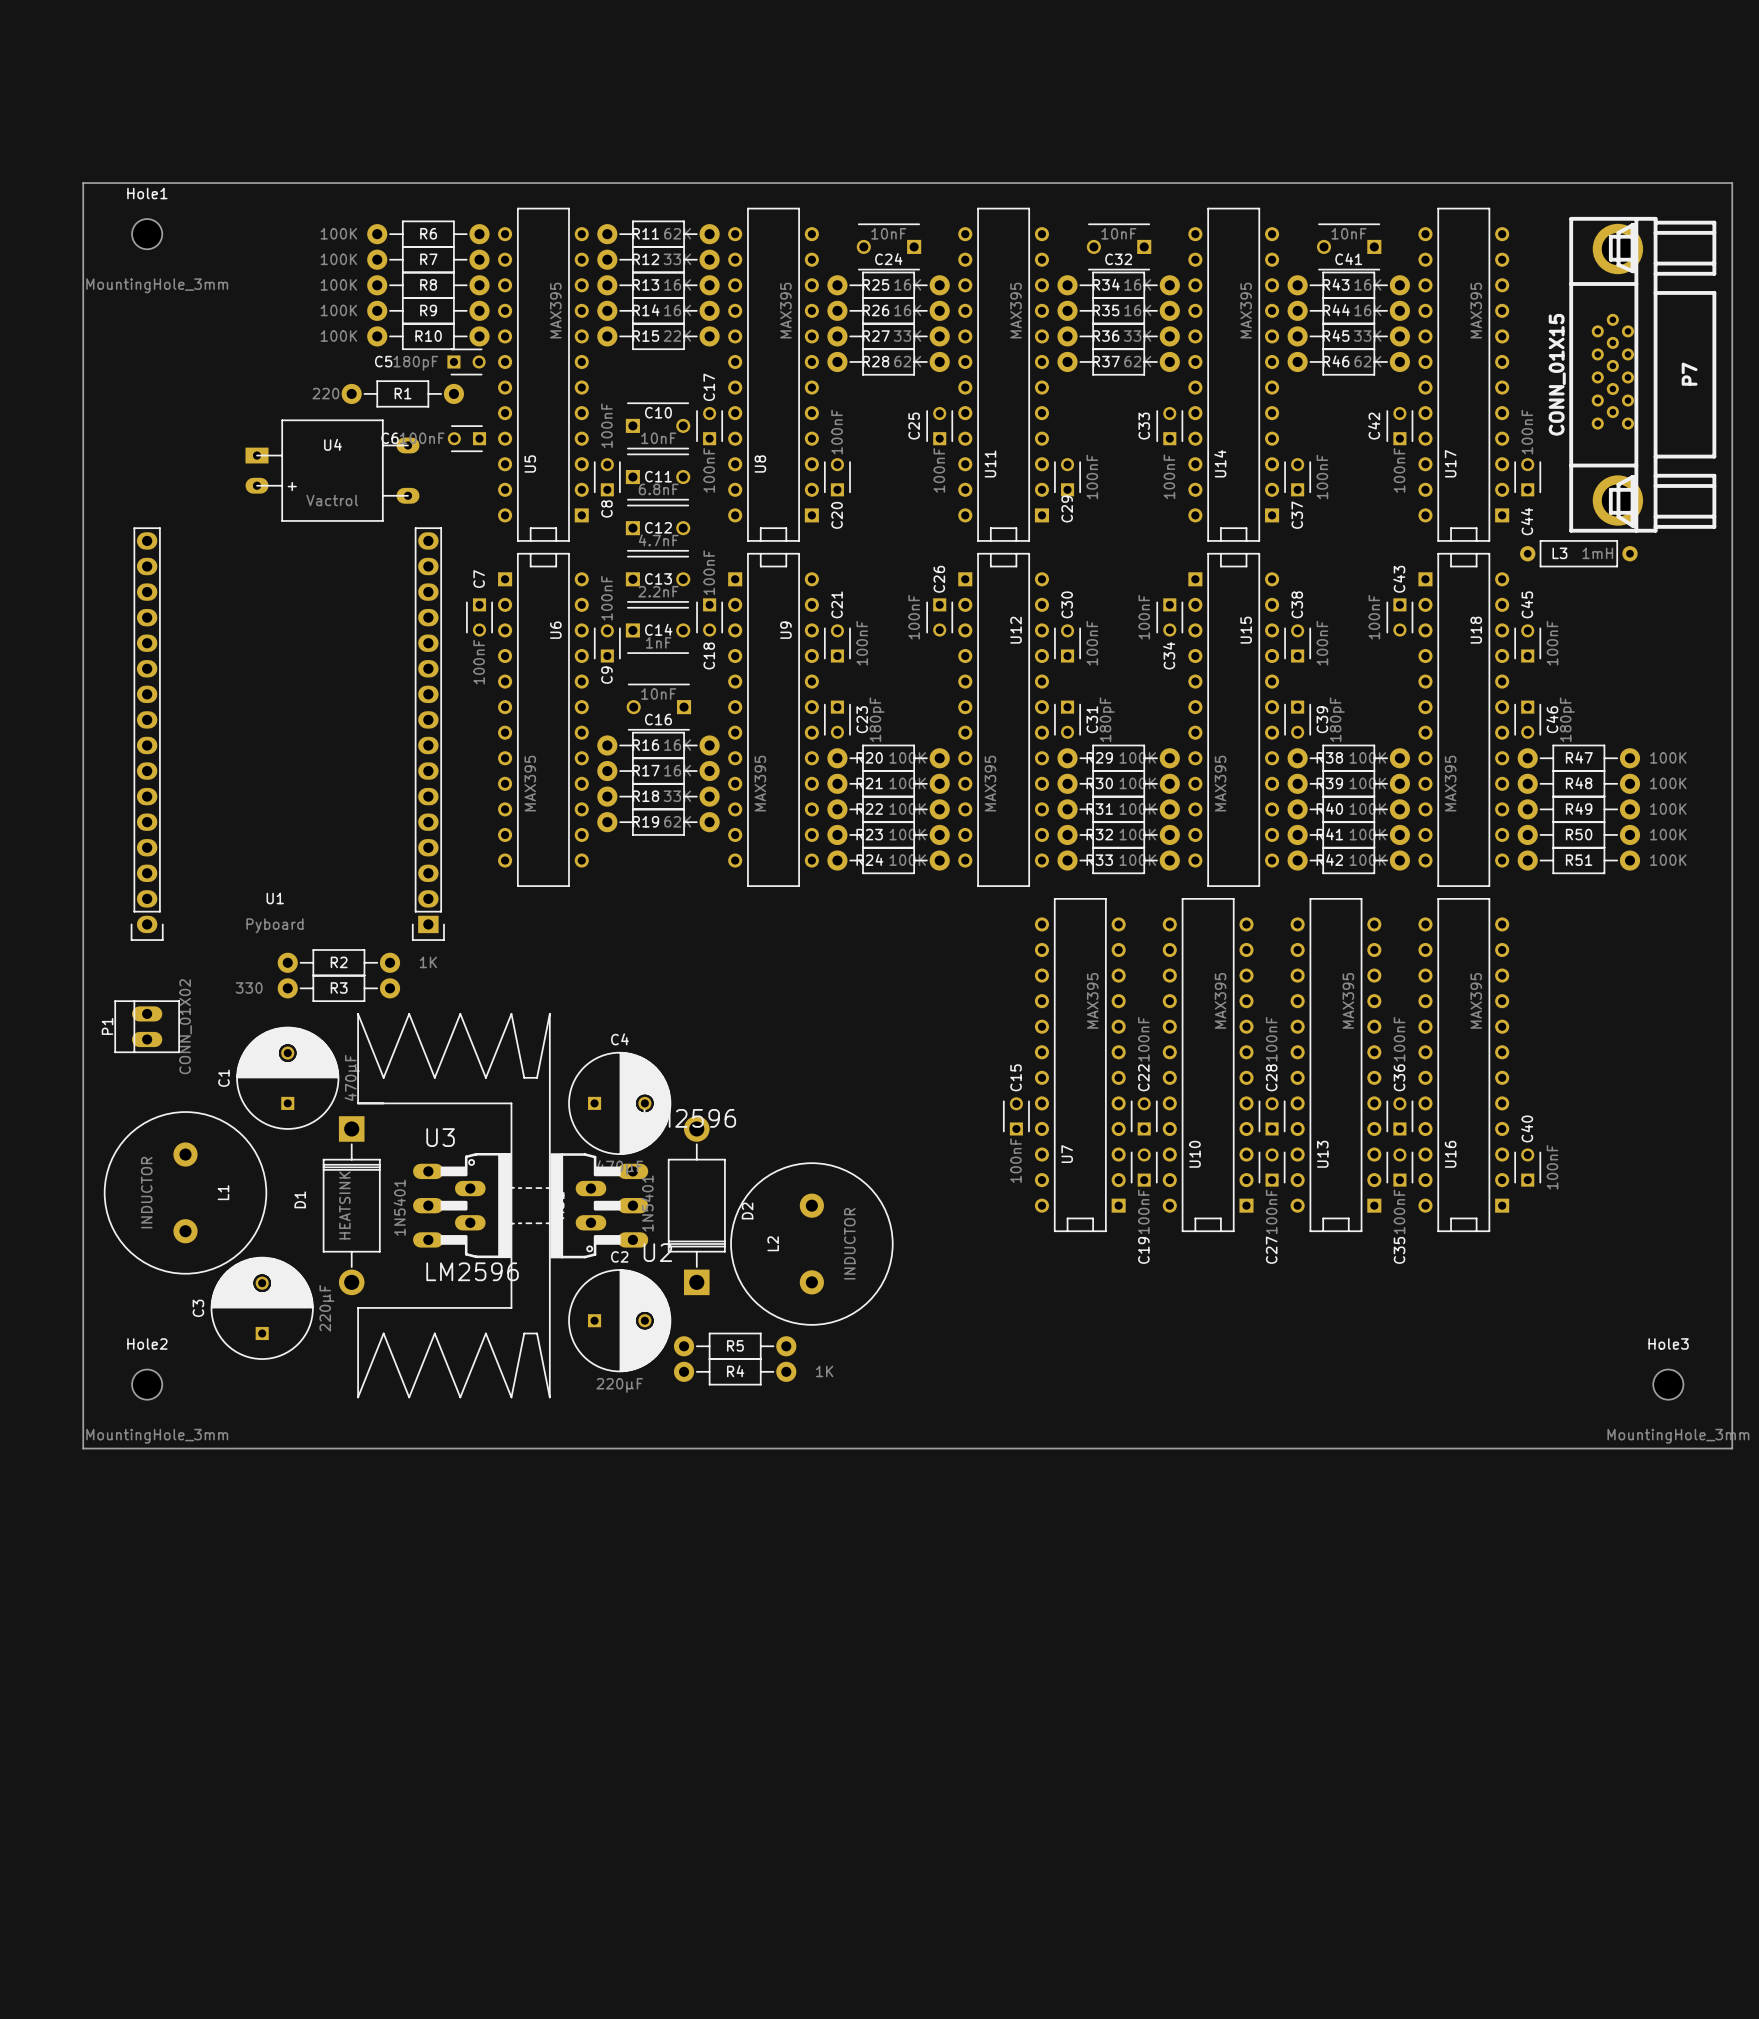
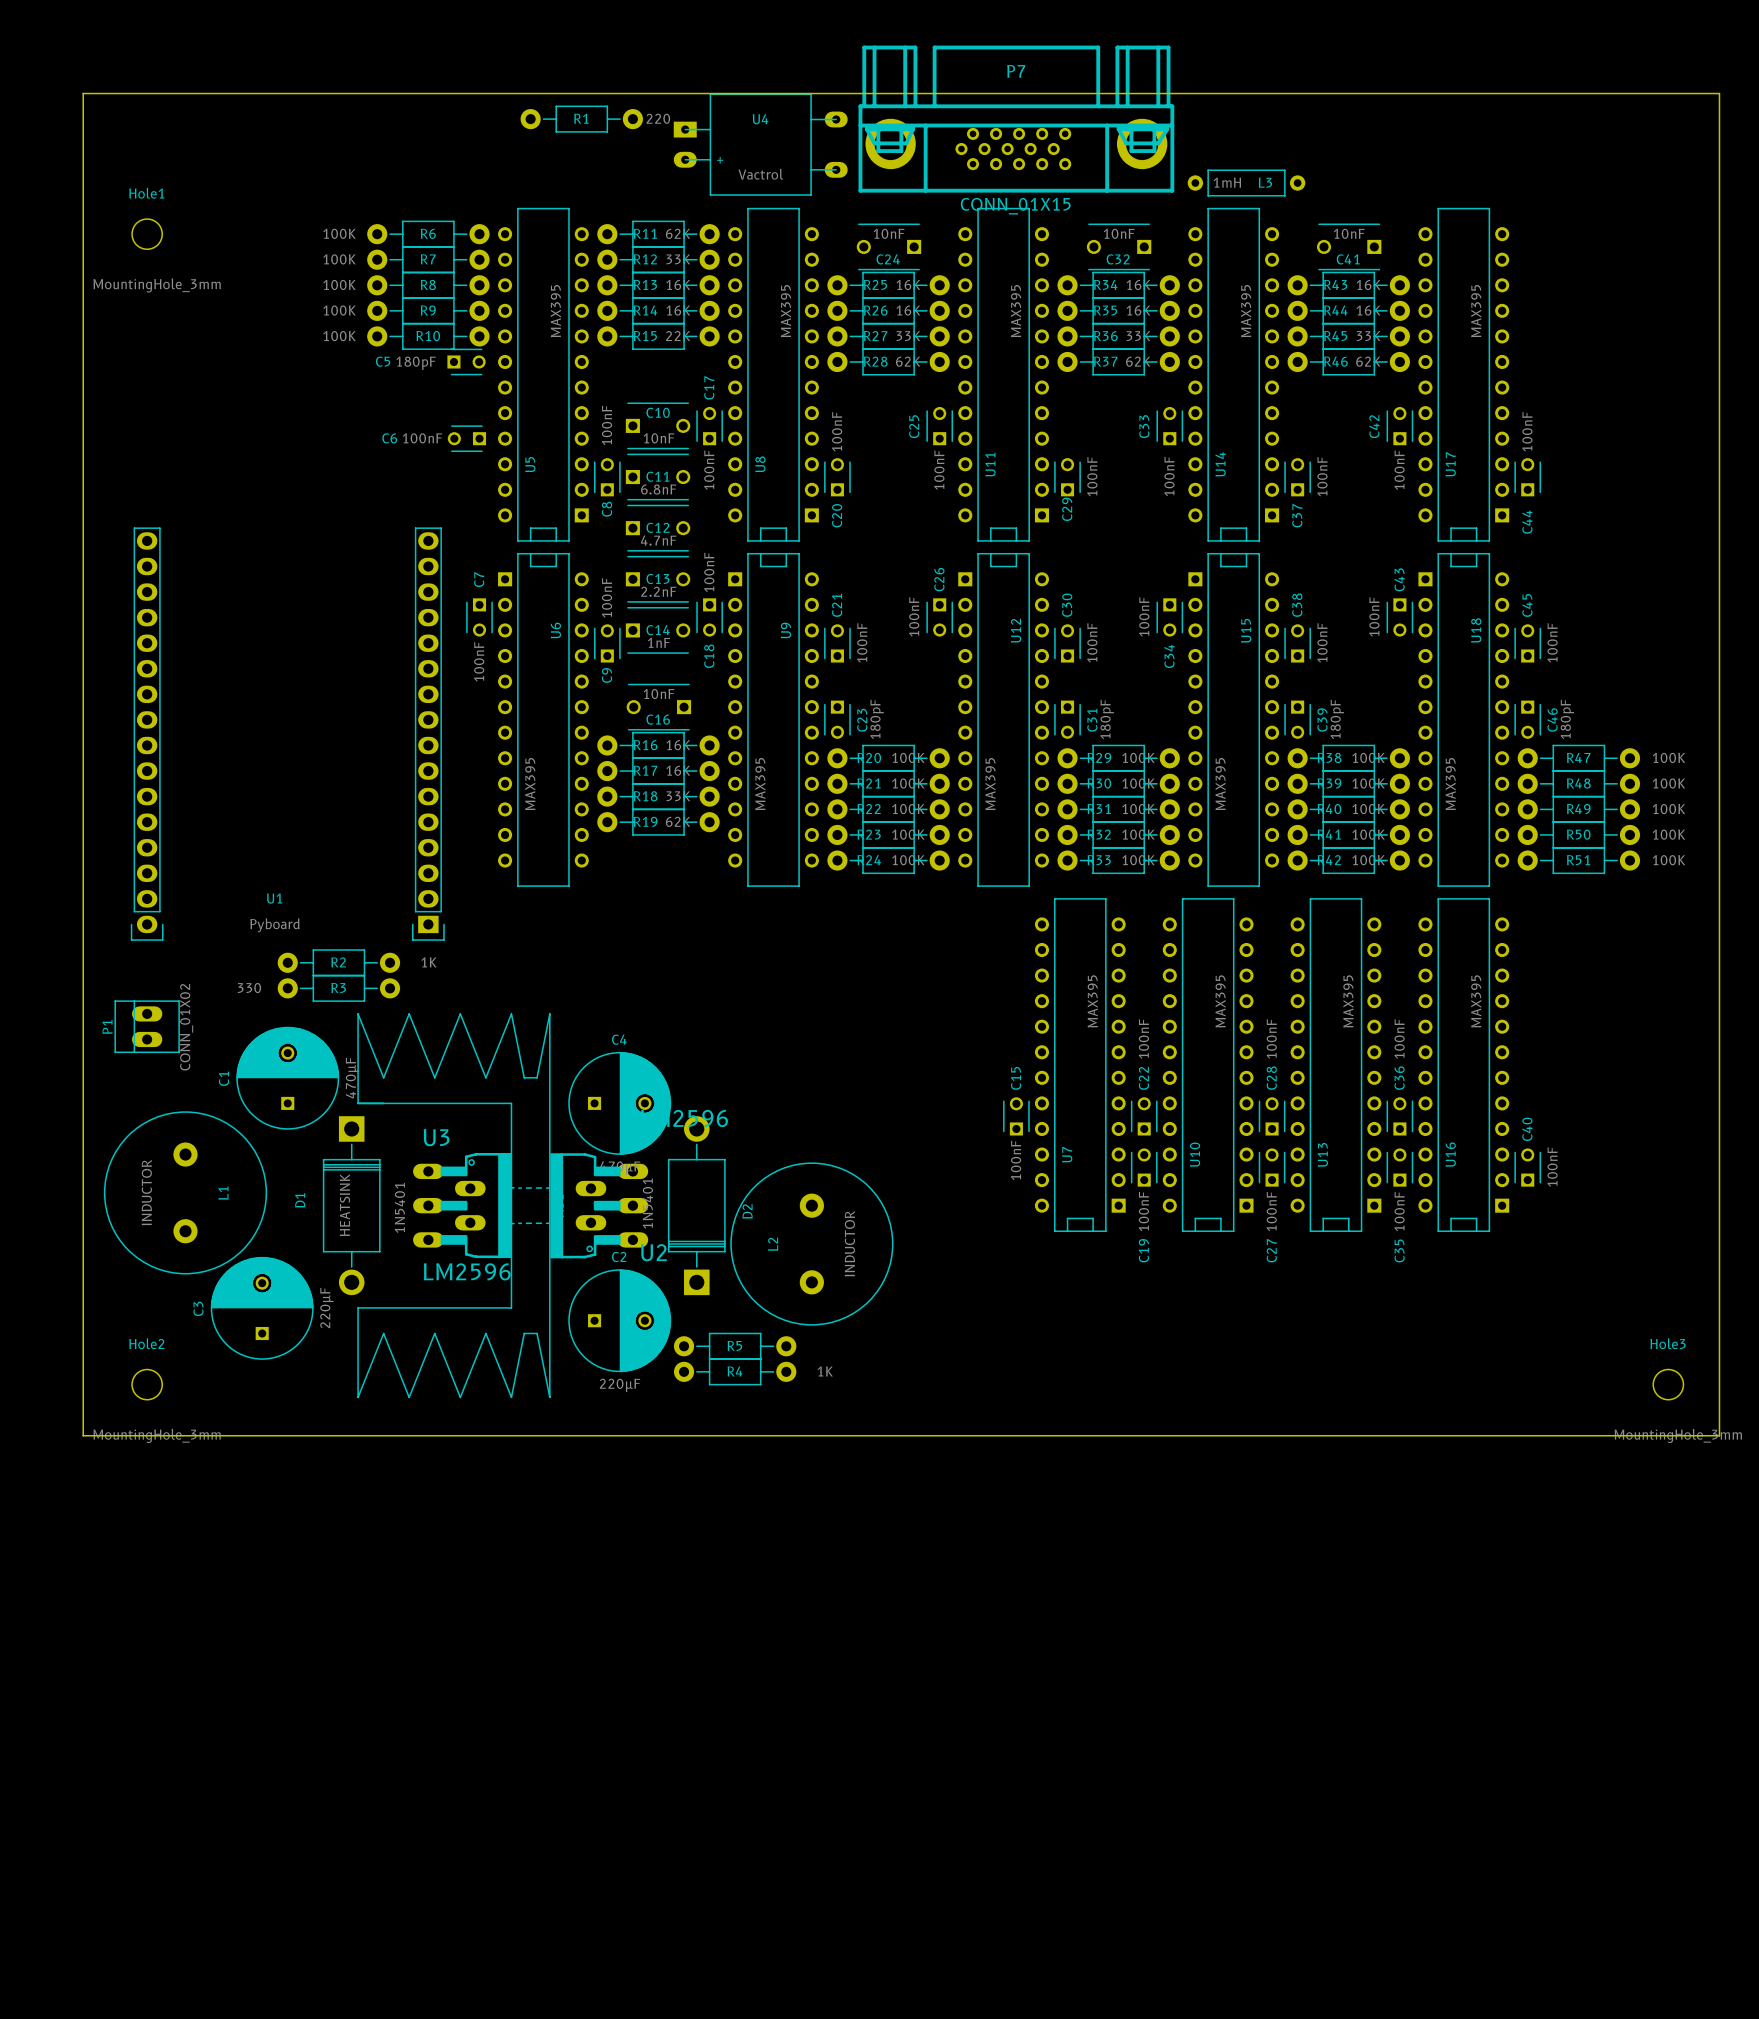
board edge: (83, 183) (1732, 183) (1732, 1448) (83, 1448) (83, 1435) -> (83, 183) (83, 93) (1719, 93) (1719, 1435) (83, 1435)
P7 rotation: 0° (1642, 374) -> 90° counterclockwise (1016, 119)
P7 position: (1642, 374) -> (1016, 119)
R1 value position: 220 (325, 393) -> 220 (658, 118)
R1 position: (402, 393) -> (581, 119)
U4 position: (332, 470) -> (760, 144)
L3 name position: L3 (1559, 553) -> L3 (1265, 182)
L3 position: (1578, 553) -> (1246, 183)
L3 value position: 1mH (1597, 553) -> 1mH (1227, 182)

